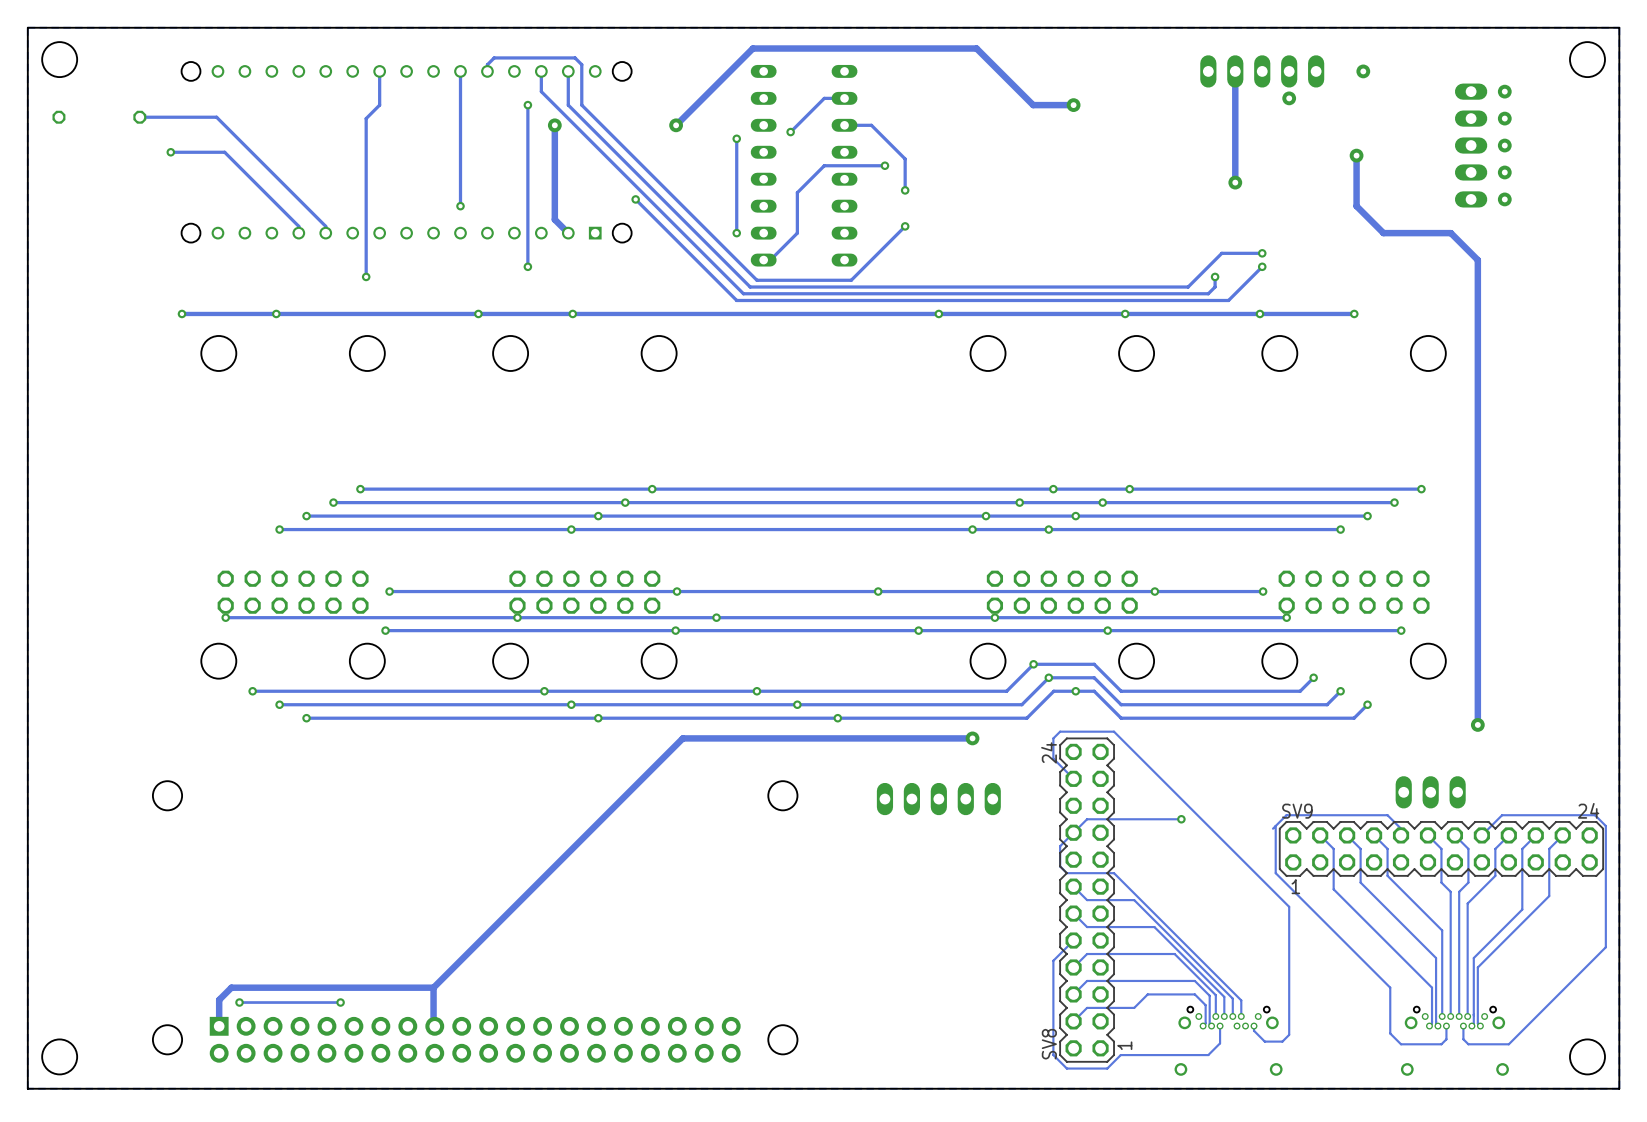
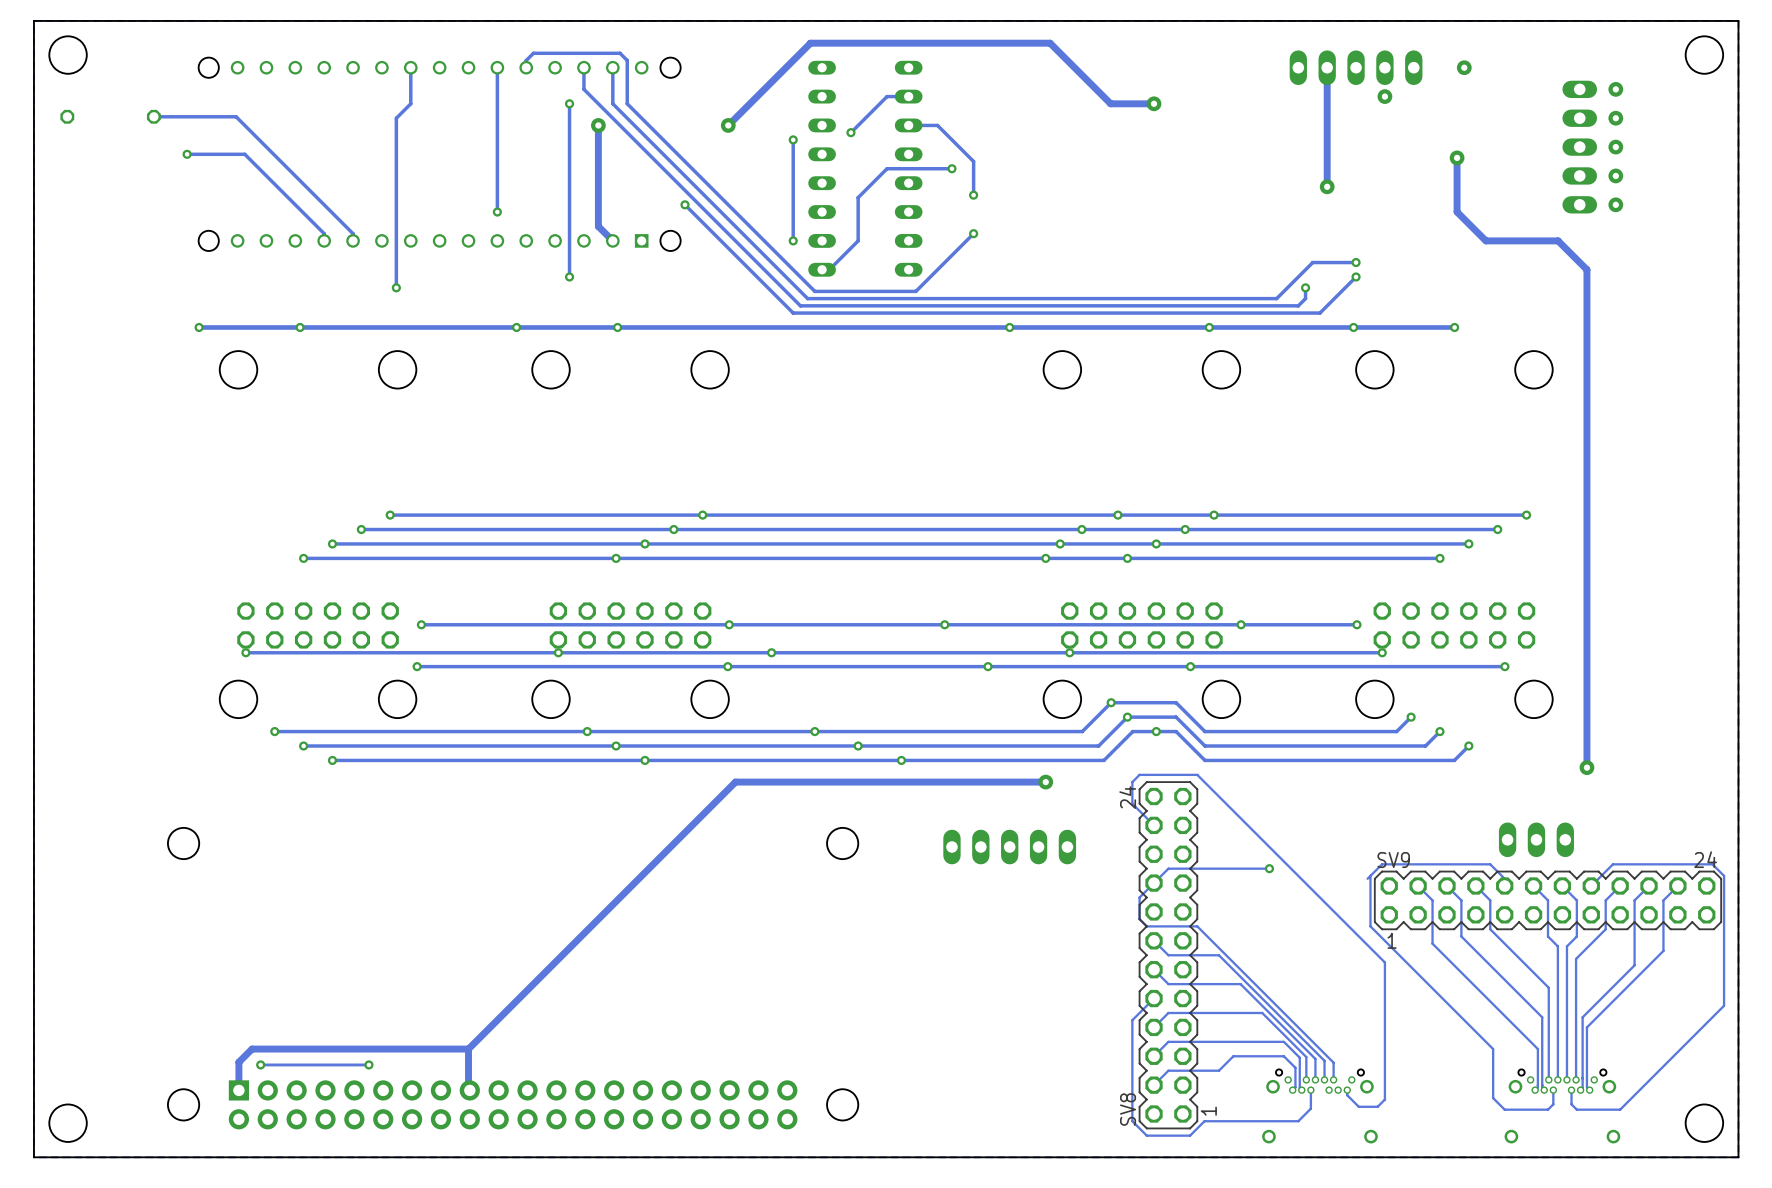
via: none -> (1117, 515)
via: (1053, 489) -> none
via: none -> (1081, 529)
via: (1019, 502) -> none

